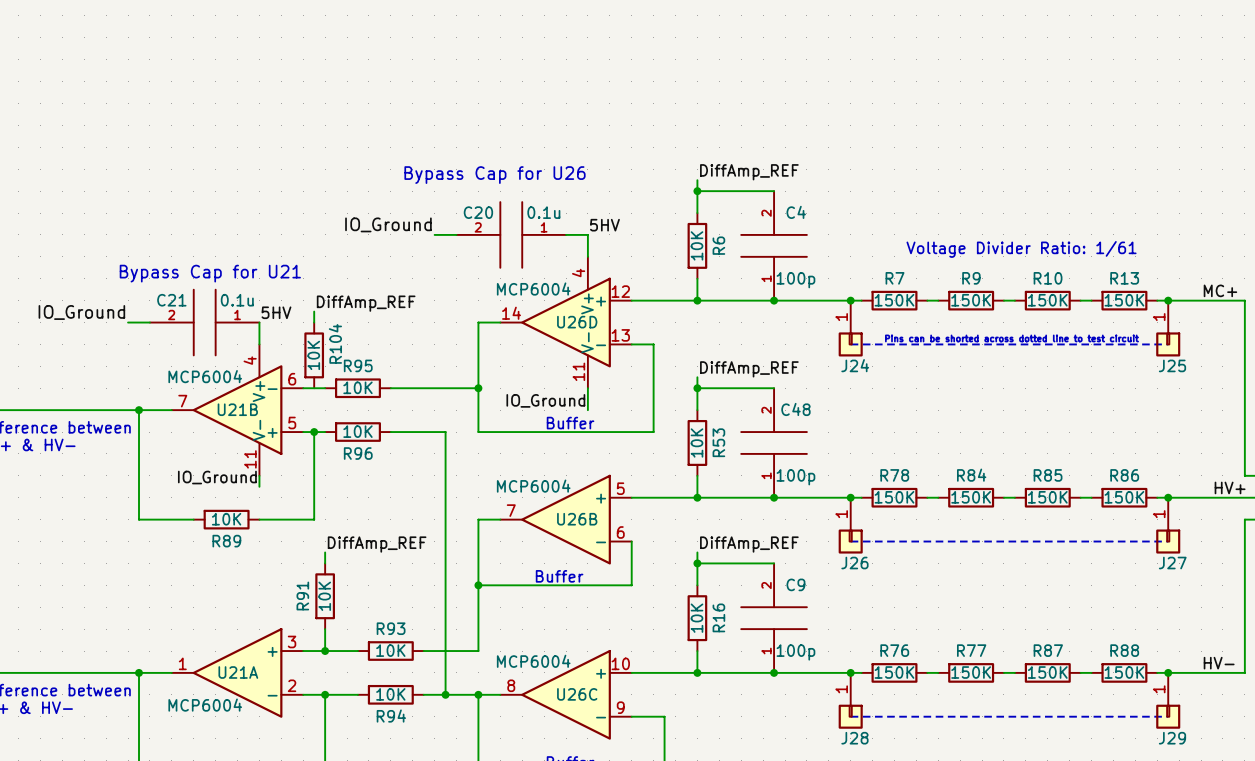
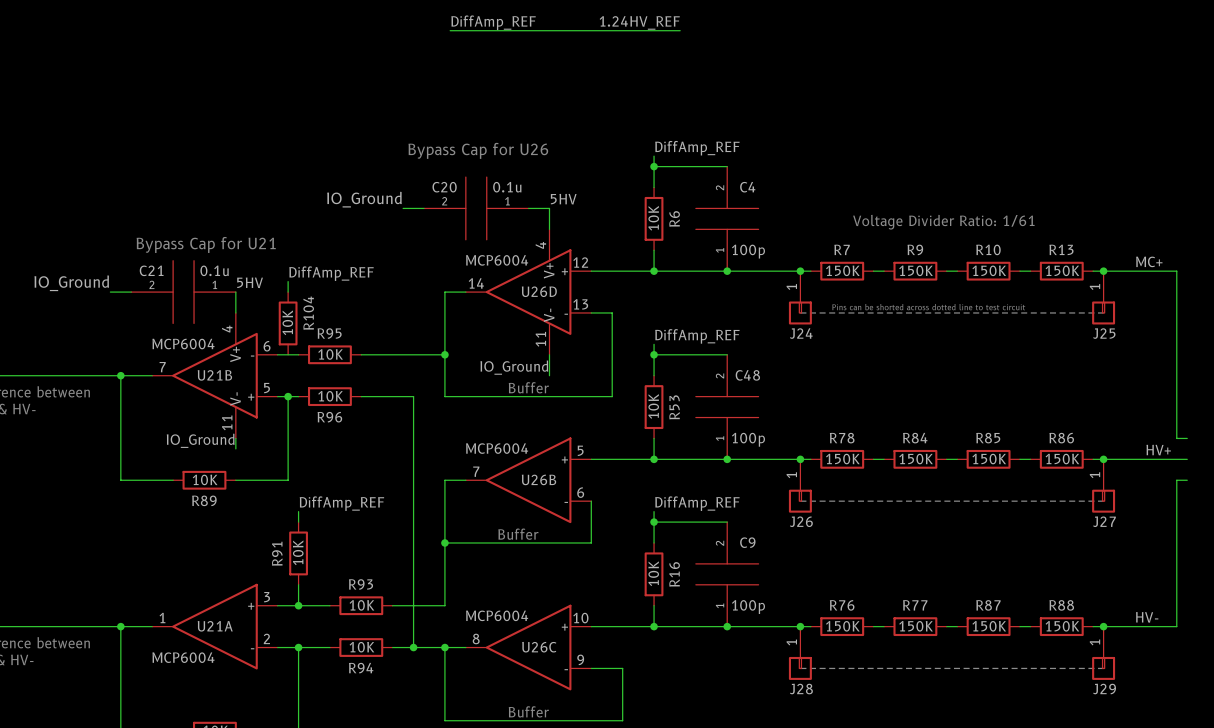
label: none -> 1.24HV_REF (639, 22)
label: none -> DiffAmp_REF (493, 22)
wire: none -> (450, 30) (680, 30)

